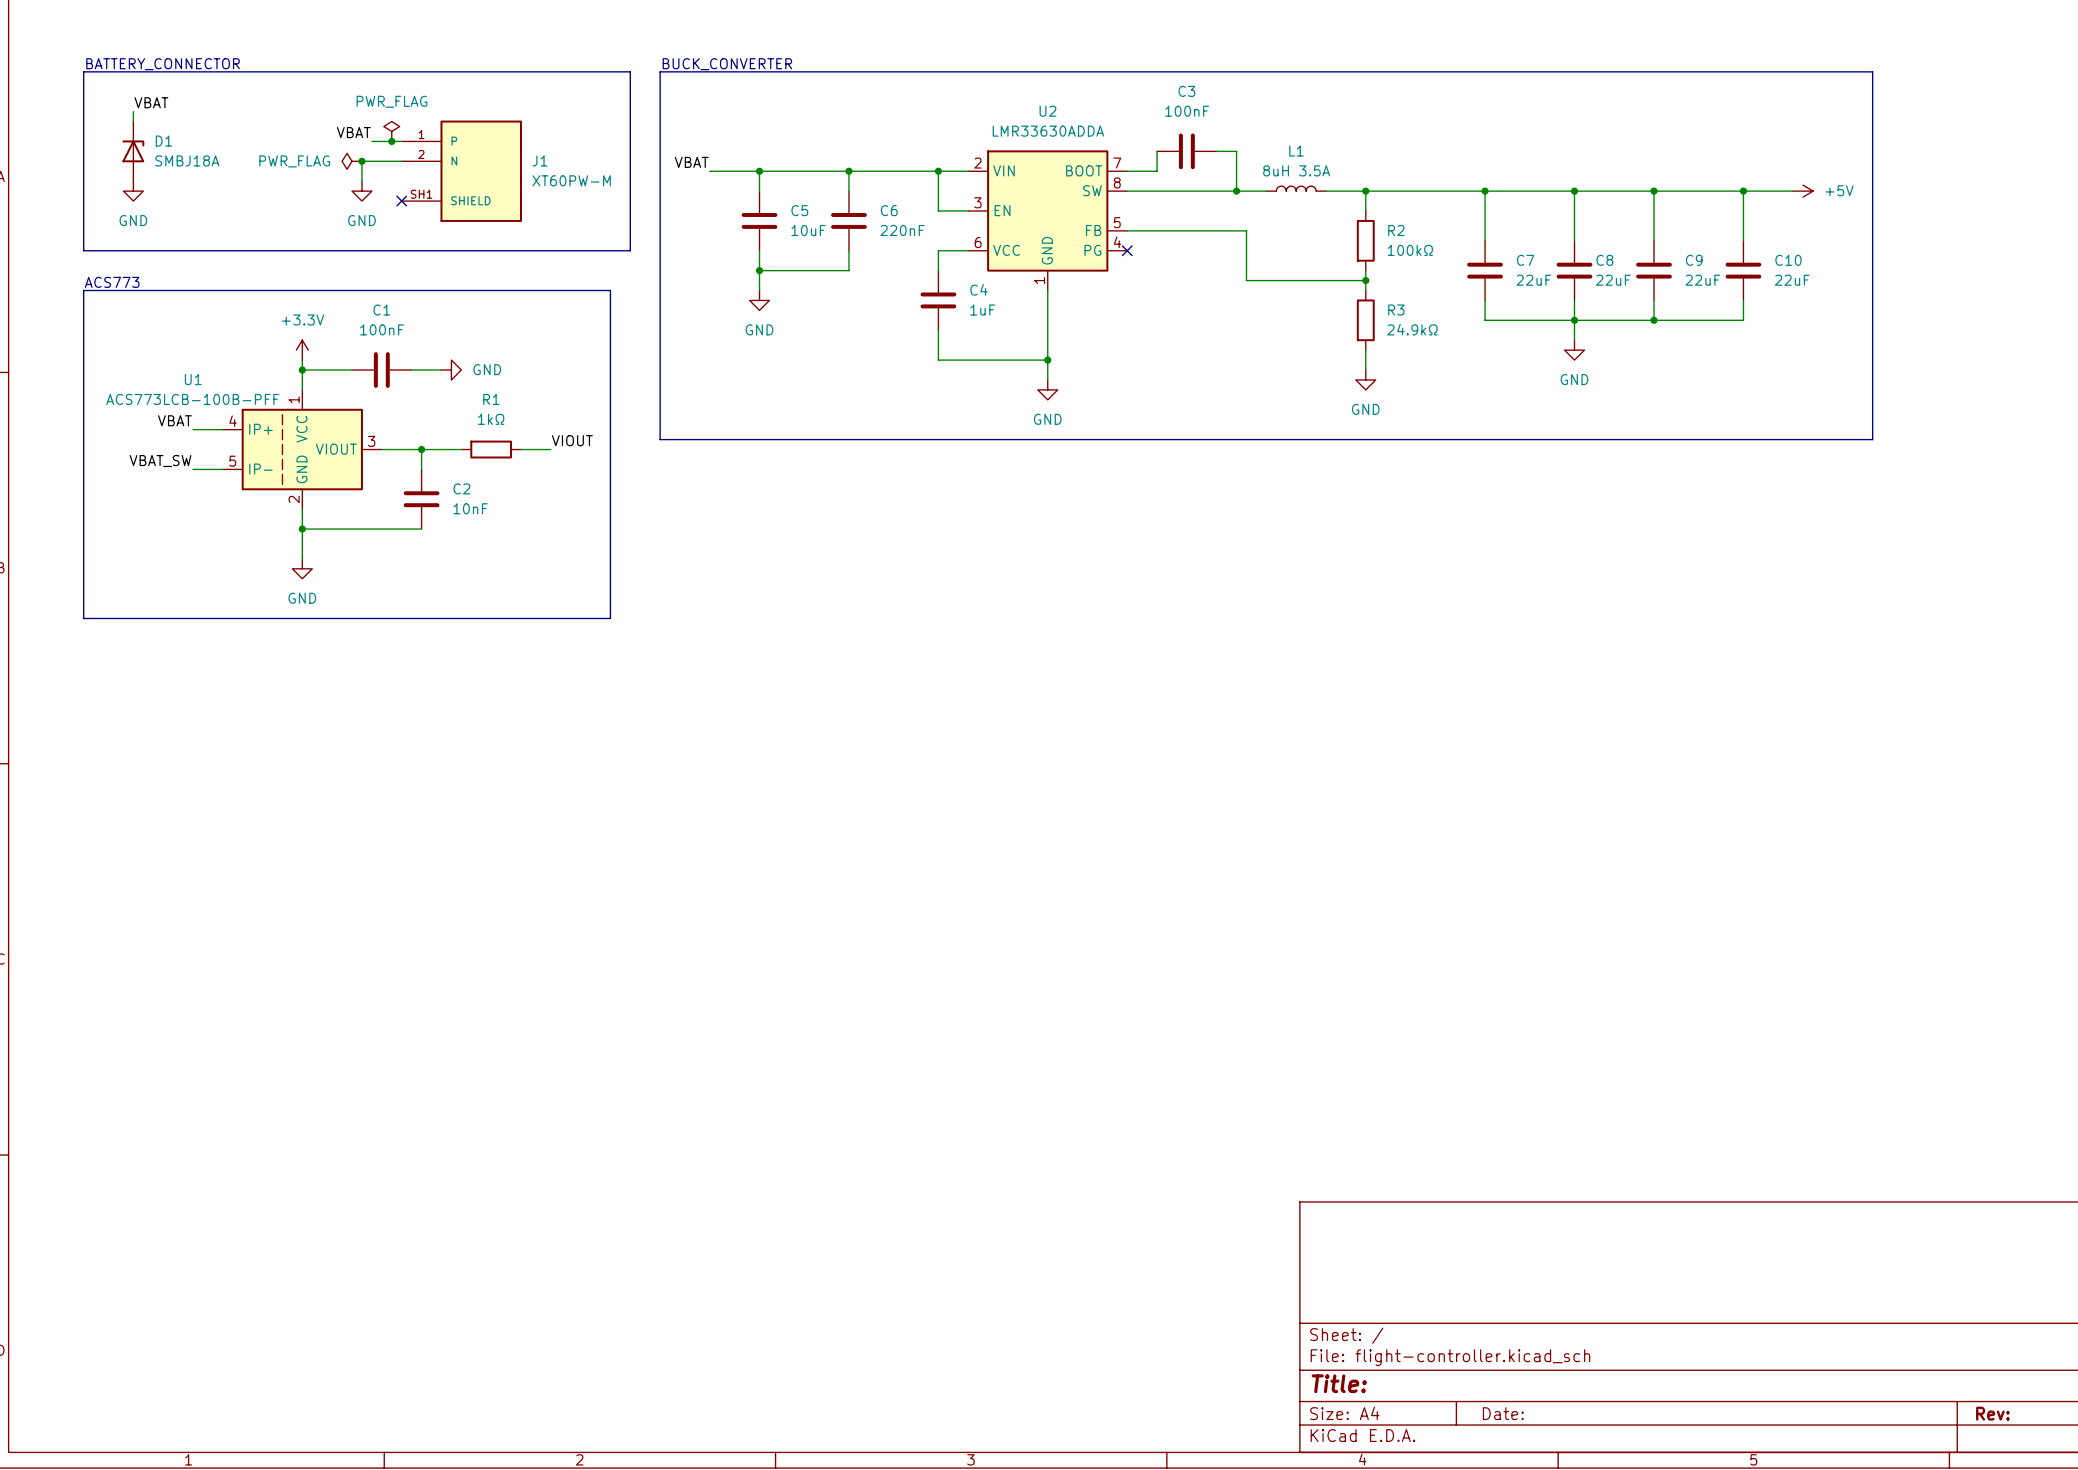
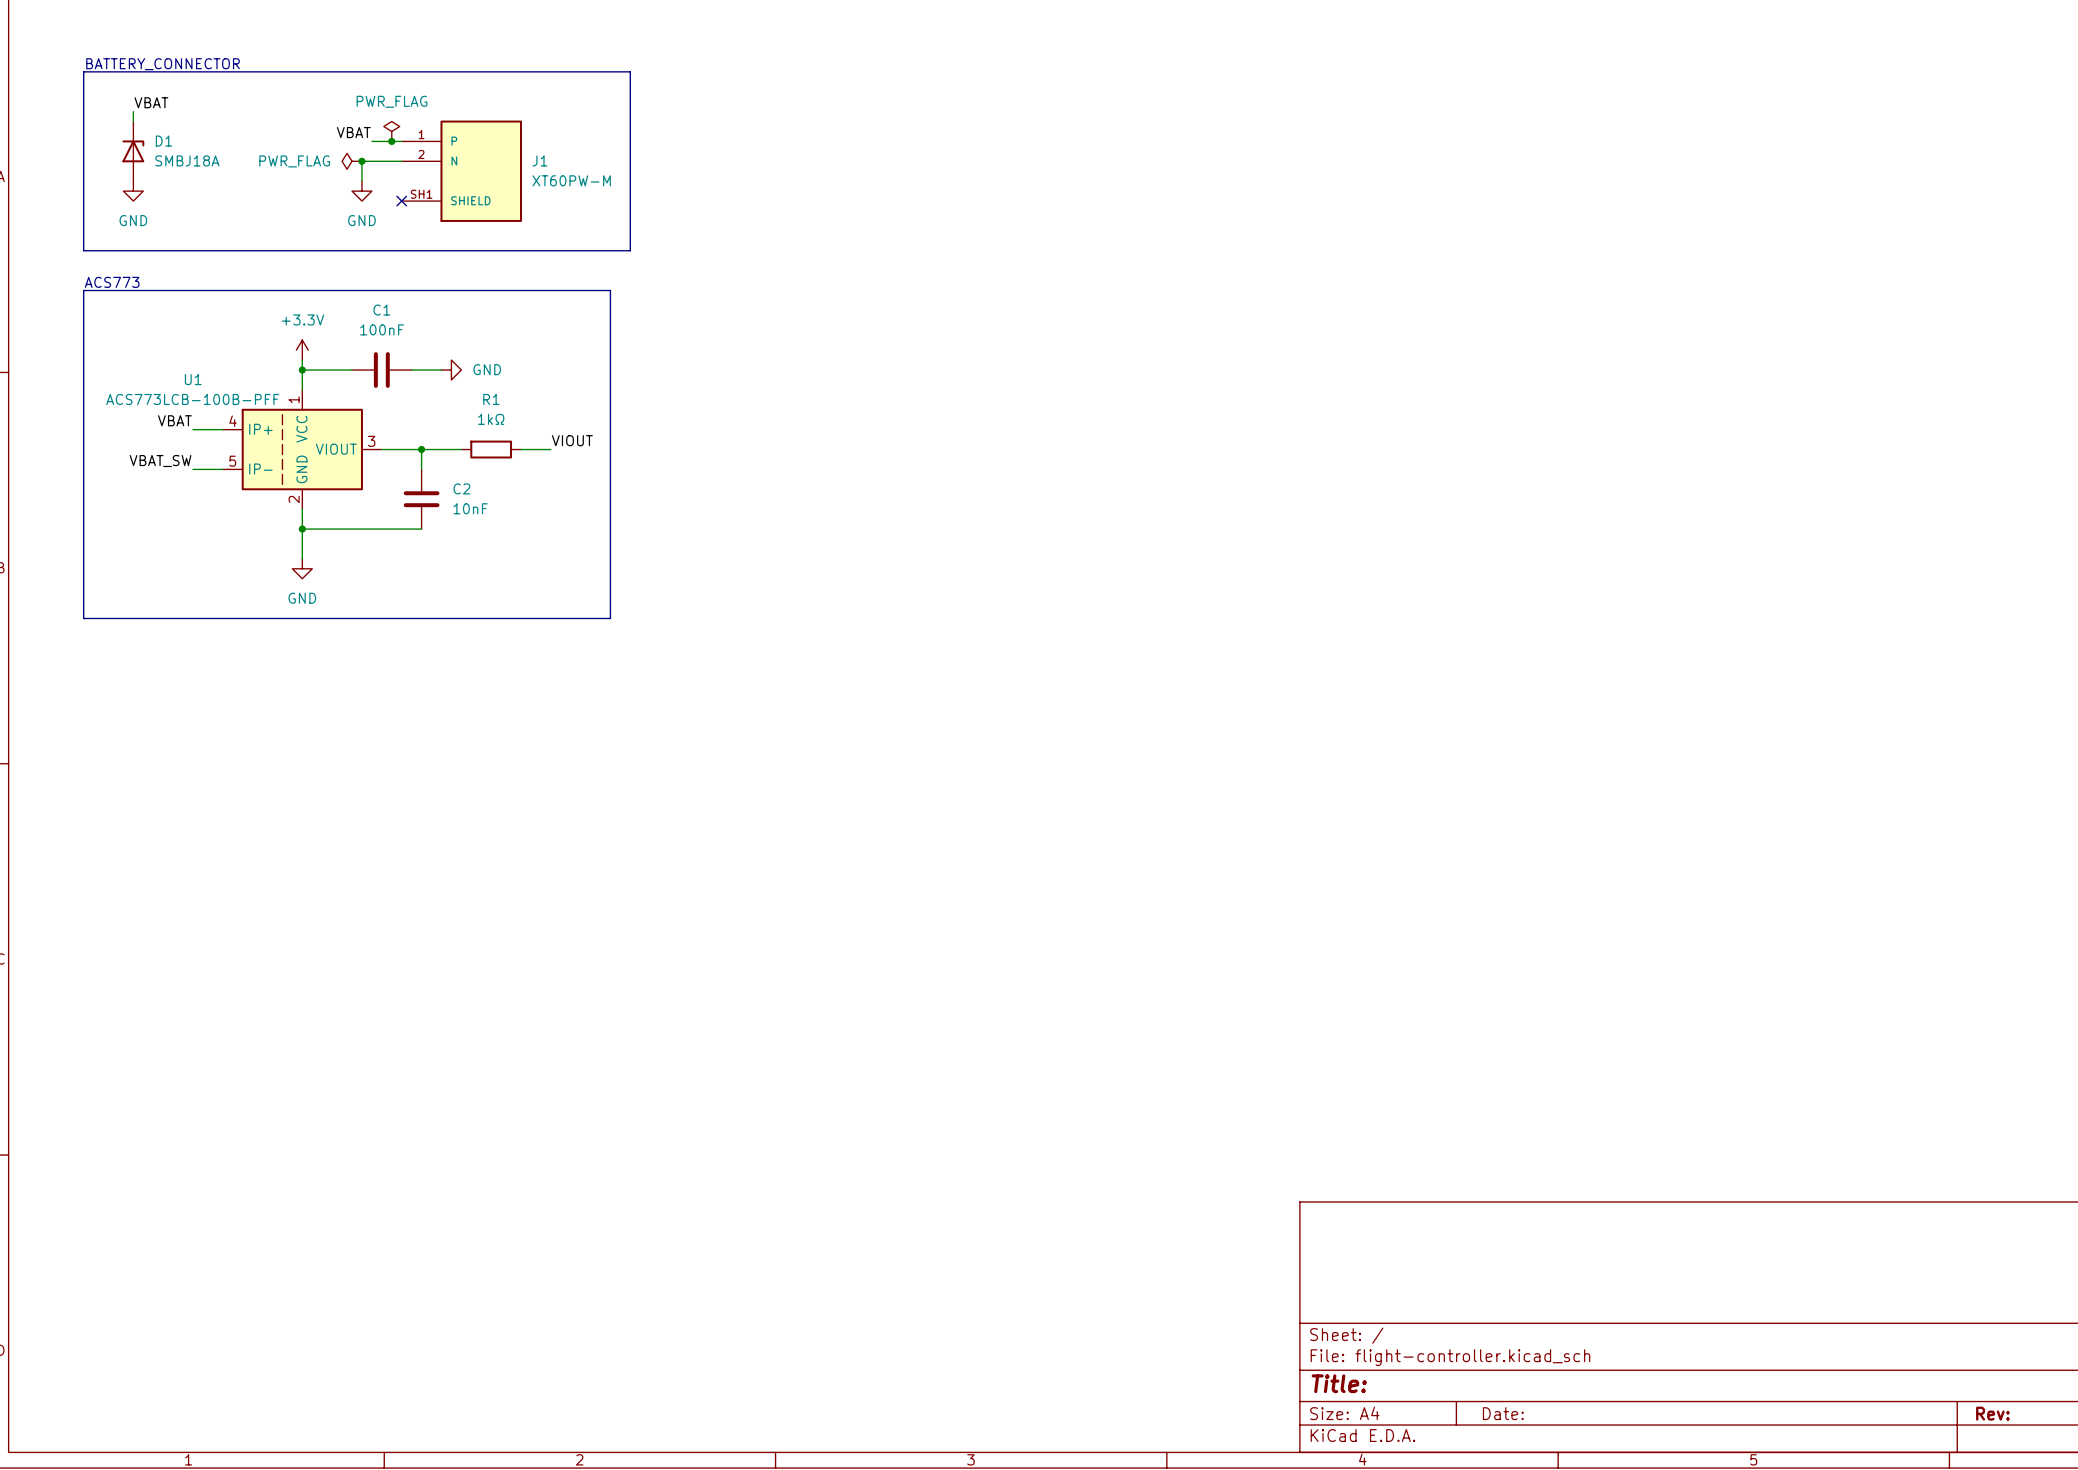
text: BUCK_CONVERTER (727, 64) -> none
line: (660, 71) (1872, 71) (1872, 439) (660, 439) (660, 71) -> none
wire: (1157, 151) (1157, 171) (1127, 171) -> none
C3: 100nF (1186, 151) -> none
wire: (1216, 151) (1236, 151) (1236, 191) -> none
label: VBAT (691, 162) -> none
wire: (709, 171) (968, 171) -> none
wire: (759, 171) (759, 191) -> none
junction: (759, 171) -> none
wire: (848, 171) (848, 191) -> none
junction: (848, 171) -> none
wire: (938, 171) (938, 211) (968, 211) -> none
junction: (938, 171) -> none
L1: 8uH 3.5A (1296, 188) -> none
wire: (1127, 191) (1266, 191) -> none
junction: (1236, 191) -> none
wire: (1326, 191) (1793, 191) -> none
wire: (1365, 191) (1365, 211) -> none
junction: (1365, 191) -> none
wire: (1485, 191) (1485, 240) -> none
junction: (1485, 191) -> none
wire: (1574, 191) (1574, 240) -> none
junction: (1574, 191) -> none
wire: (1654, 191) (1654, 240) -> none
junction: (1654, 191) -> none
wire: (1743, 191) (1743, 240) -> none
junction: (1743, 191) -> none
power symbol: +5V (1803, 191) -> none
C5: 10uF (759, 220) -> none
C6: 220nF (848, 220) -> none
U2: LMR33630ADDA (1047, 220) -> none
wire: (1127, 230) (1246, 230) (1246, 280) (1365, 280) -> none
R2: 100kΩ (1365, 240) -> none
wire: (759, 250) (759, 290) -> none
wire: (848, 250) (848, 270) (759, 270) -> none
wire: (968, 250) (938, 250) (938, 270) -> none
no-connect mark: (1127, 250) -> none
junction: (759, 270) -> none
wire: (1365, 270) (1365, 290) -> none
C7: 22uF (1485, 270) -> none
C8: 22uF (1574, 270) -> none
C9: 22uF (1654, 270) -> none
C10: 22uF (1743, 270) -> none
junction: (1365, 280) -> none
wire: (1047, 290) (1047, 379) -> none
power symbol: GND (759, 300) -> none
C4: 1uF (938, 300) -> none
wire: (1485, 300) (1485, 320) (1743, 320) (1743, 300) -> none
wire: (1574, 300) (1574, 340) -> none
wire: (1654, 300) (1654, 320) -> none
R3: 24.9kΩ (1365, 320) -> none
junction: (1574, 320) -> none
junction: (1654, 320) -> none
wire: (938, 330) (938, 360) (1047, 360) -> none
wire: (1365, 350) (1365, 370) -> none
power symbol: GND (1574, 350) -> none
junction: (1047, 360) -> none
power symbol: GND (1365, 379) -> none
power symbol: GND (1047, 389) -> none

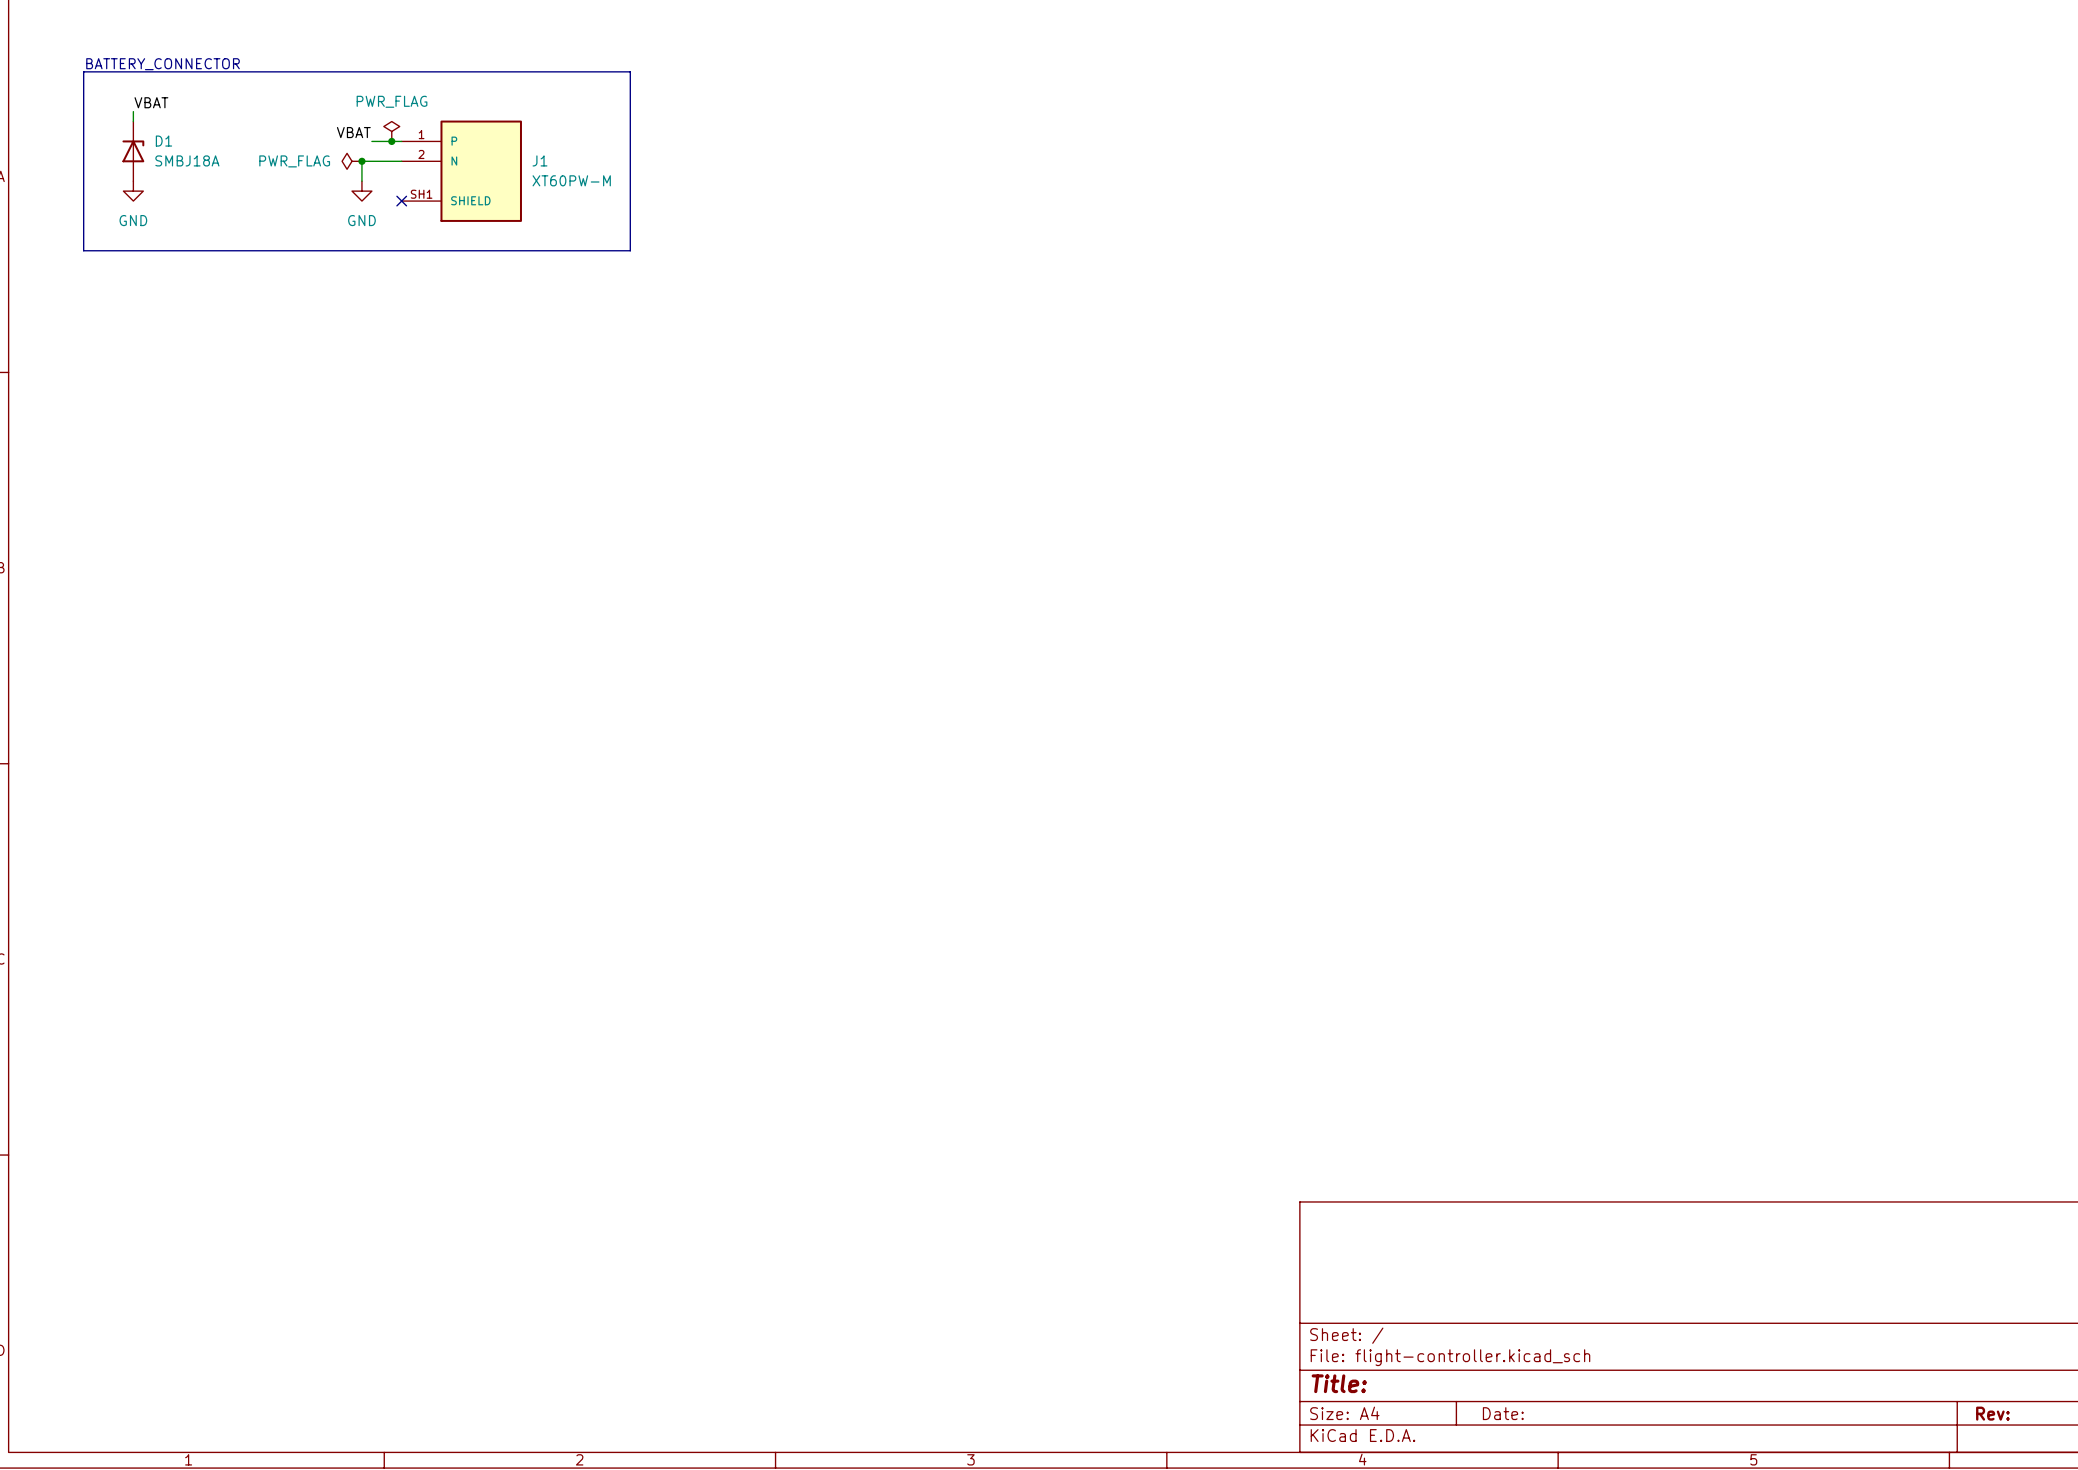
text: ACS773 (112, 282) -> none
line: (83, 290) (610, 290) (610, 618) (83, 618) (83, 290) -> none
power symbol: +3.3V (302, 350) -> none
wire: (302, 360) (302, 389) -> none
wire: (302, 370) (352, 370) -> none
junction: (302, 370) -> none
C1: 100nF (381, 370) -> none
wire: (411, 370) (441, 370) -> none
power symbol: GND (451, 370) -> none
label: VBAT (174, 420) -> none
wire: (193, 429) (222, 429) -> none
label: VIOUT (572, 440) -> none
U1: ACS773LCB-100B-PFF (302, 449) -> none
wire: (381, 449) (461, 449) -> none
wire: (421, 449) (421, 469) -> none
junction: (421, 449) -> none
R1: 1kΩ (491, 449) -> none
wire: (520, 449) (550, 449) -> none
label: VBAT_SW (160, 461) -> none
wire: (193, 469) (222, 469) -> none
C2: 10nF (421, 499) -> none
wire: (302, 509) (302, 558) -> none
wire: (302, 529) (421, 529) -> none
junction: (302, 529) -> none
power symbol: GND (302, 568) -> none

